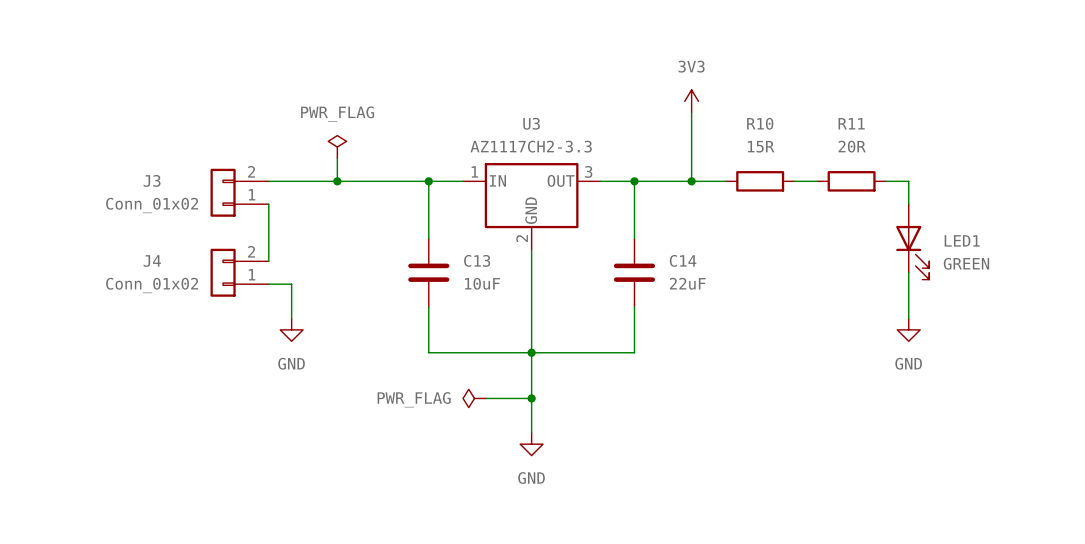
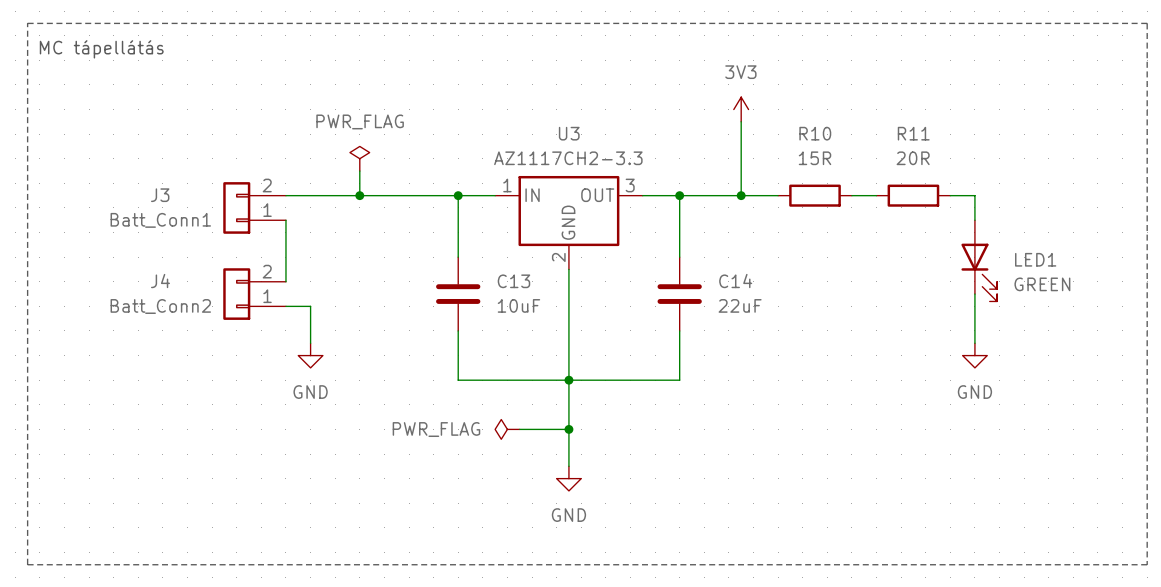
line: none -> (27, 23) (1147, 23) (1147, 564) (27, 564) (27, 23)
text: none -> MC tápellátás (101, 49)
J3 value: Conn_01x02 (152, 205) -> Batt_Conn1 (160, 220)
J4 value: Conn_01x02 (152, 285) -> Batt_Conn2 (160, 306)

